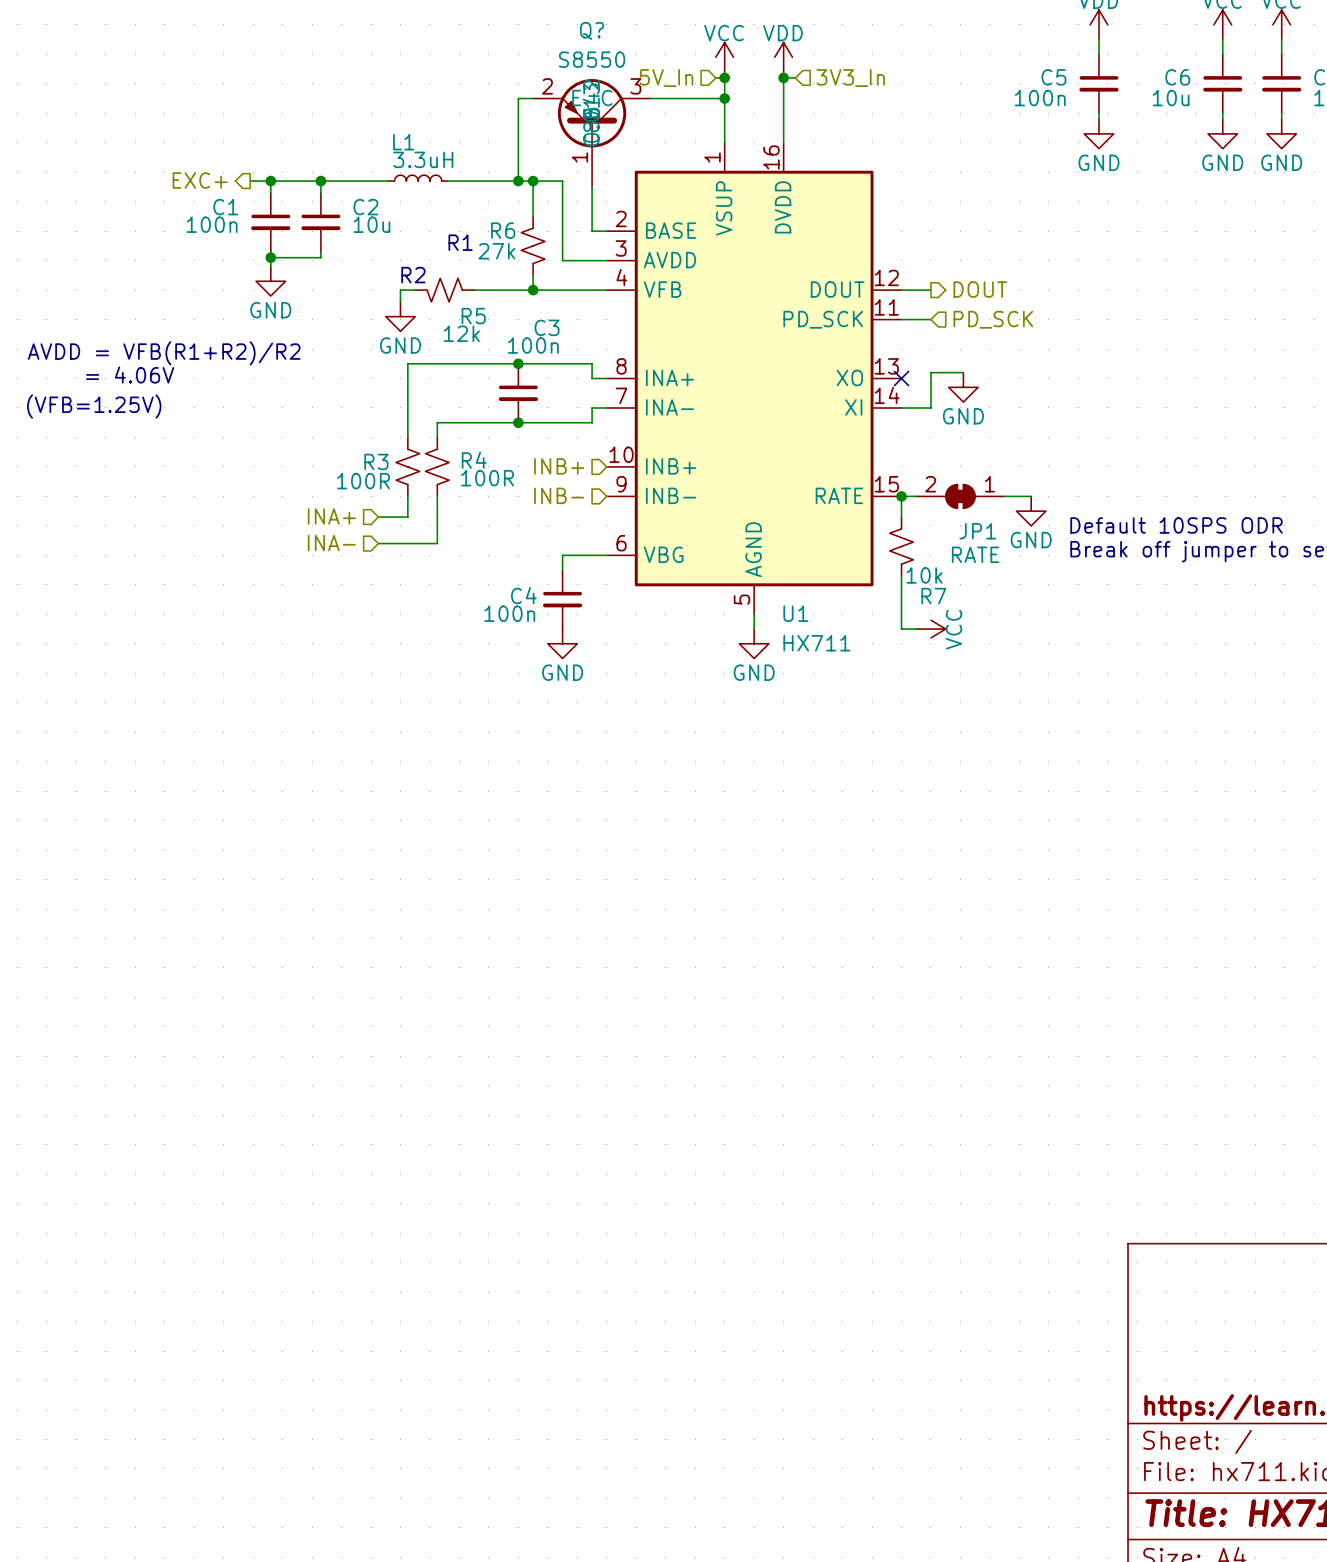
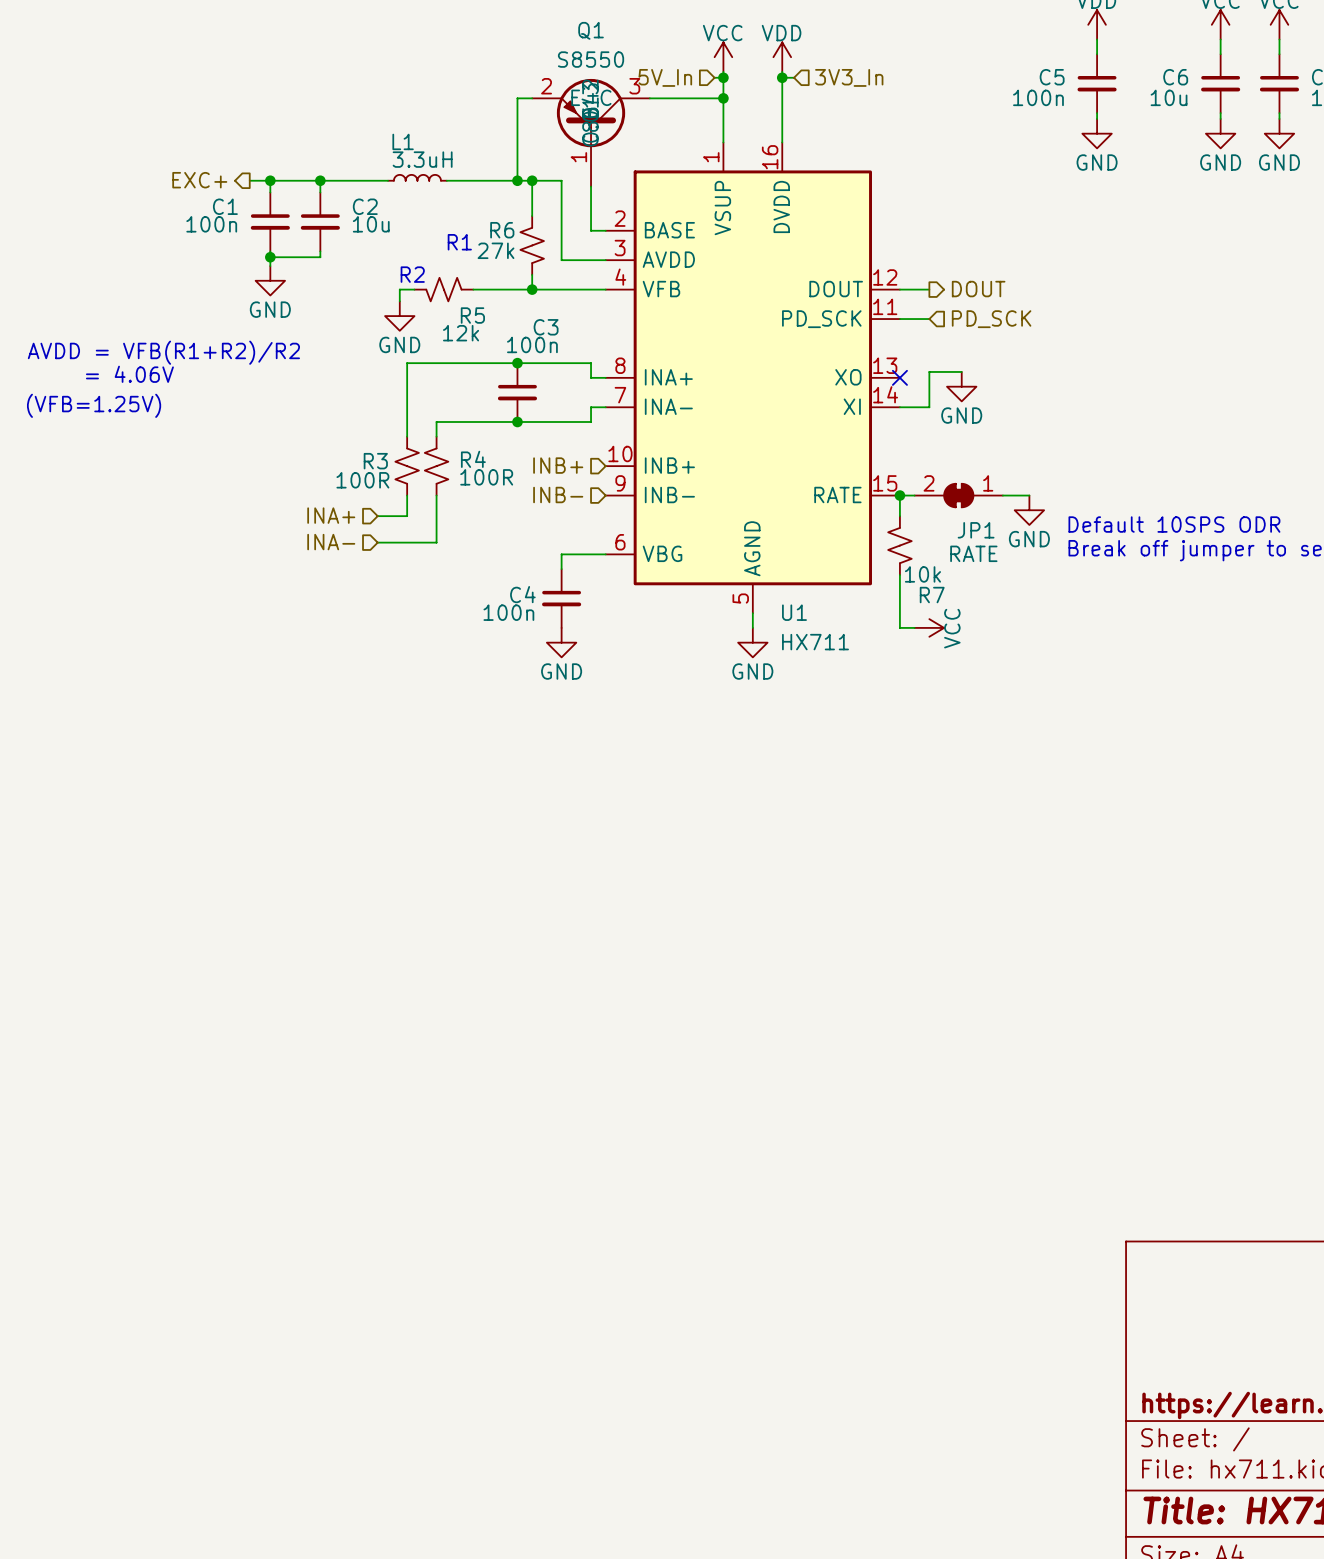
Q? name: Q? (592, 30) -> Q1 (591, 30)

